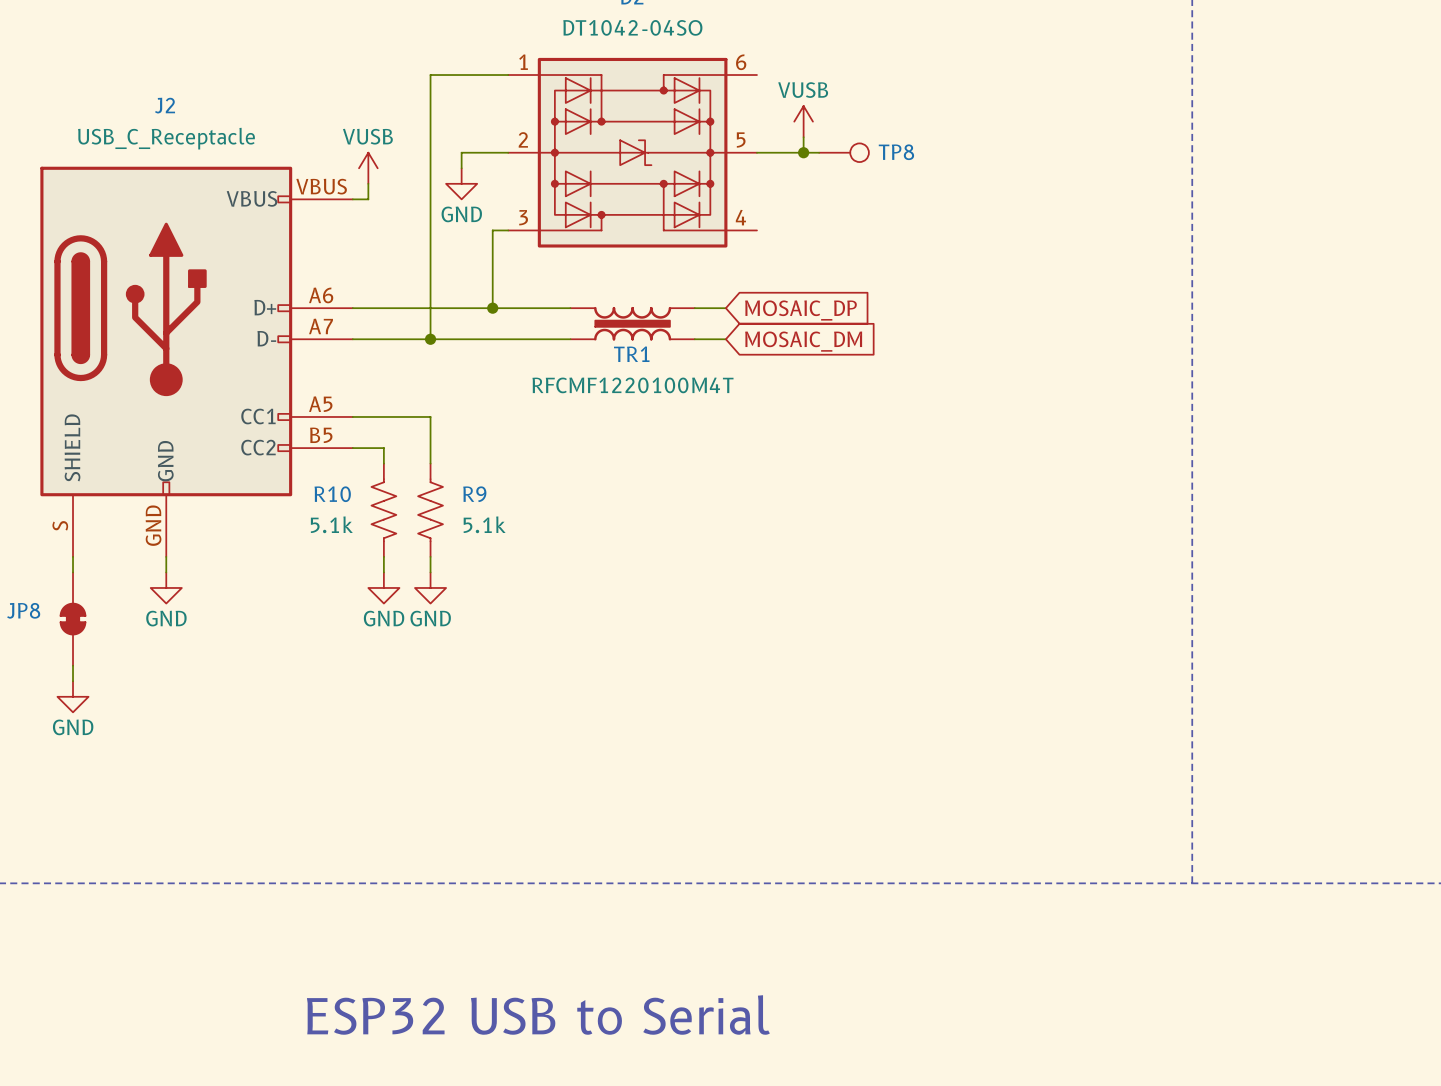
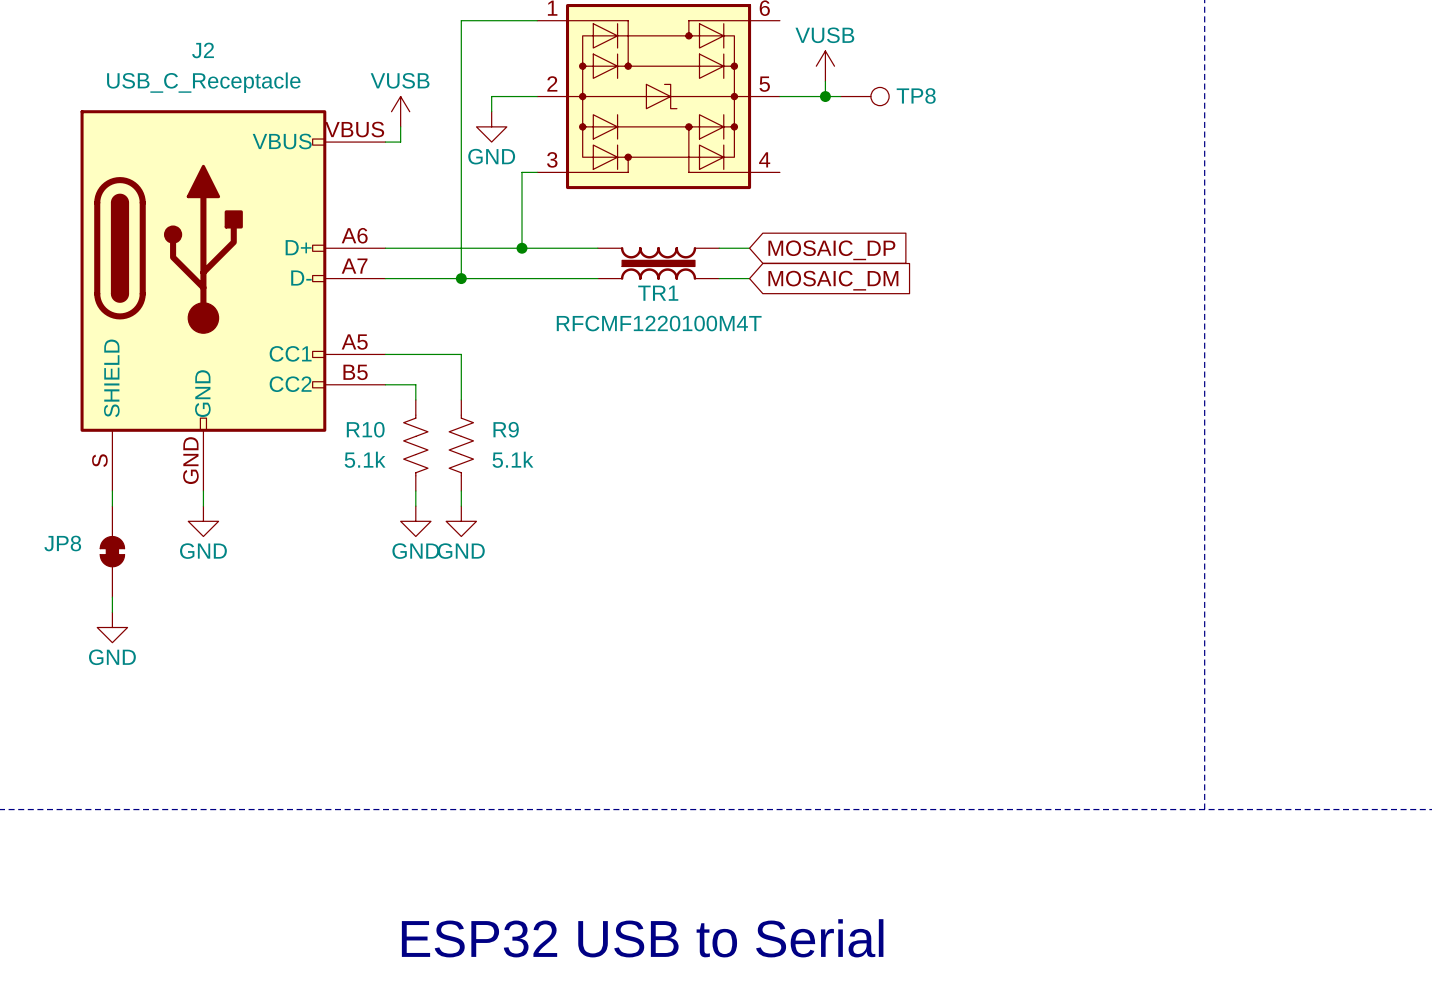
text position: ESP32 USB to Serial (538, 1014) -> ESP32 USB to Serial (642, 938)

